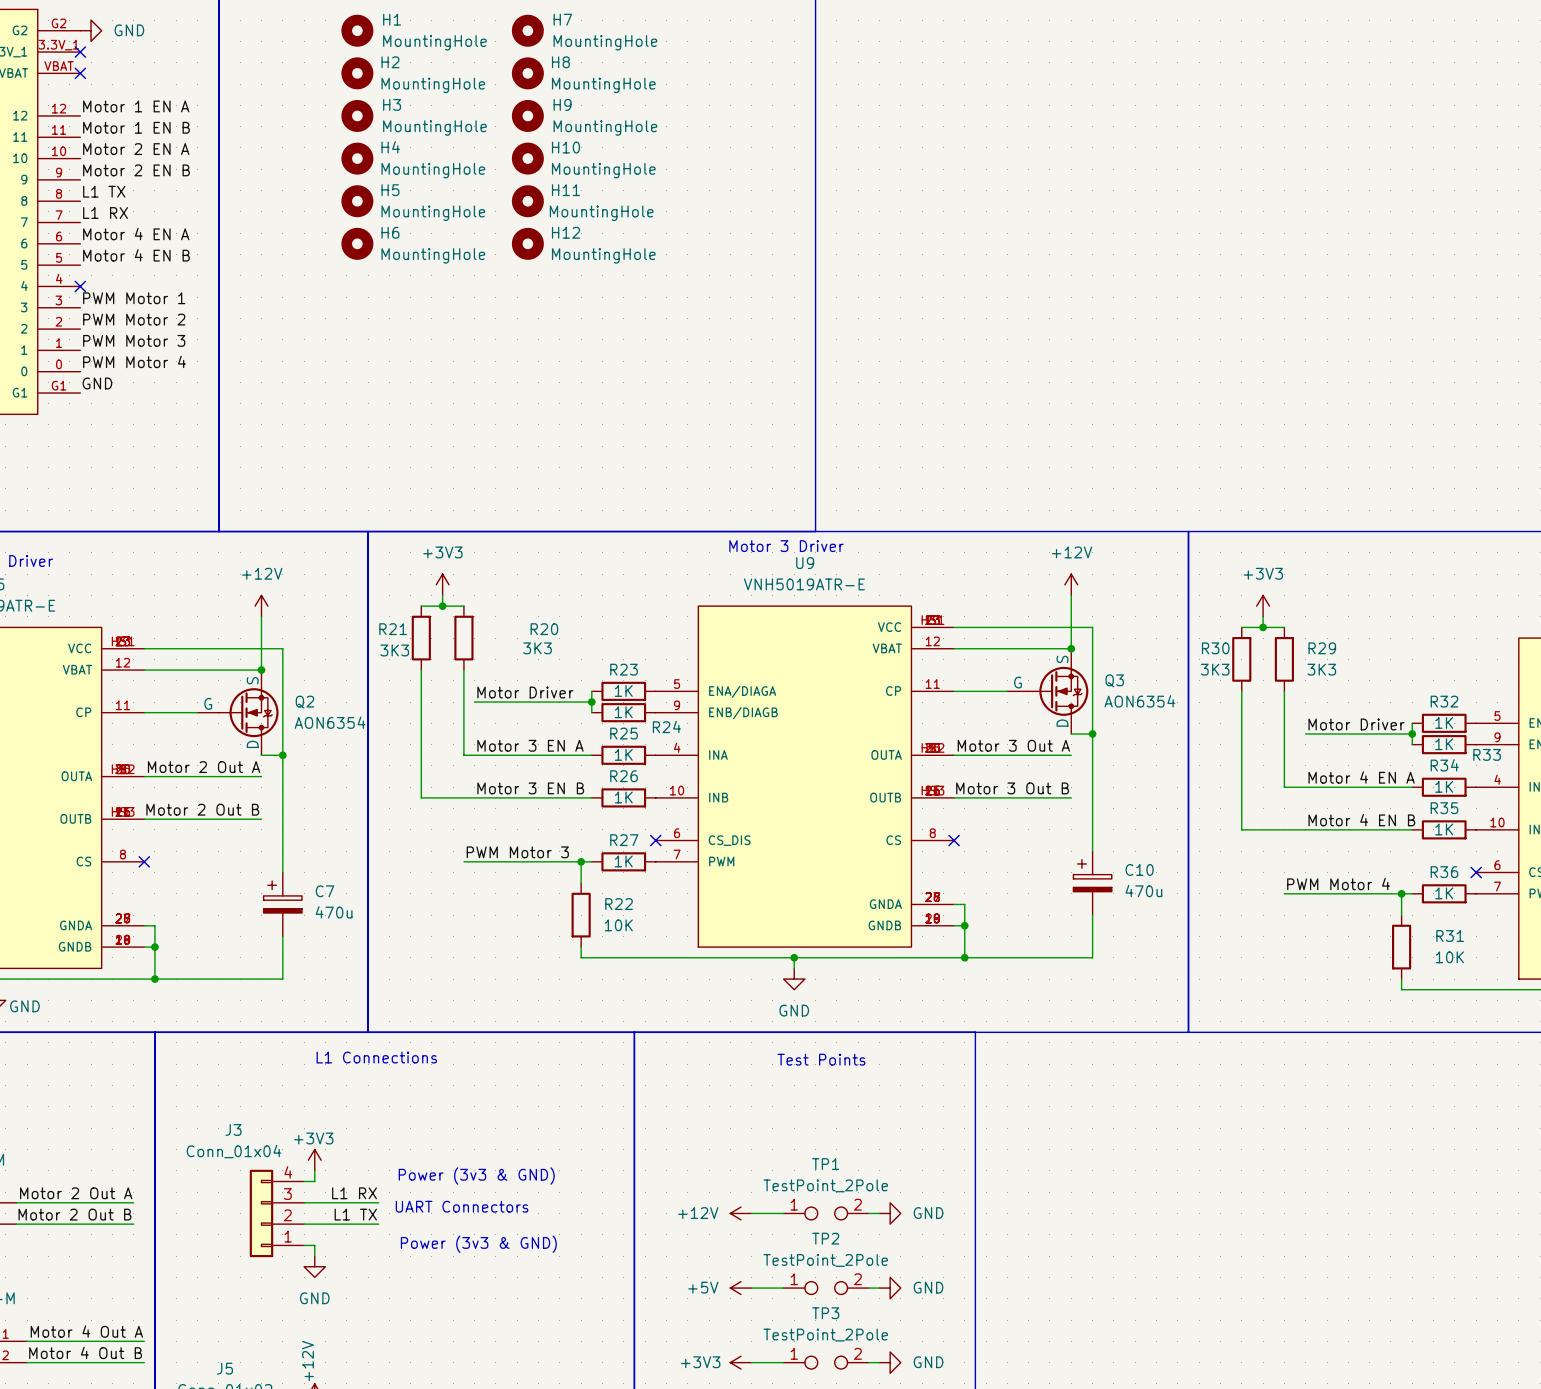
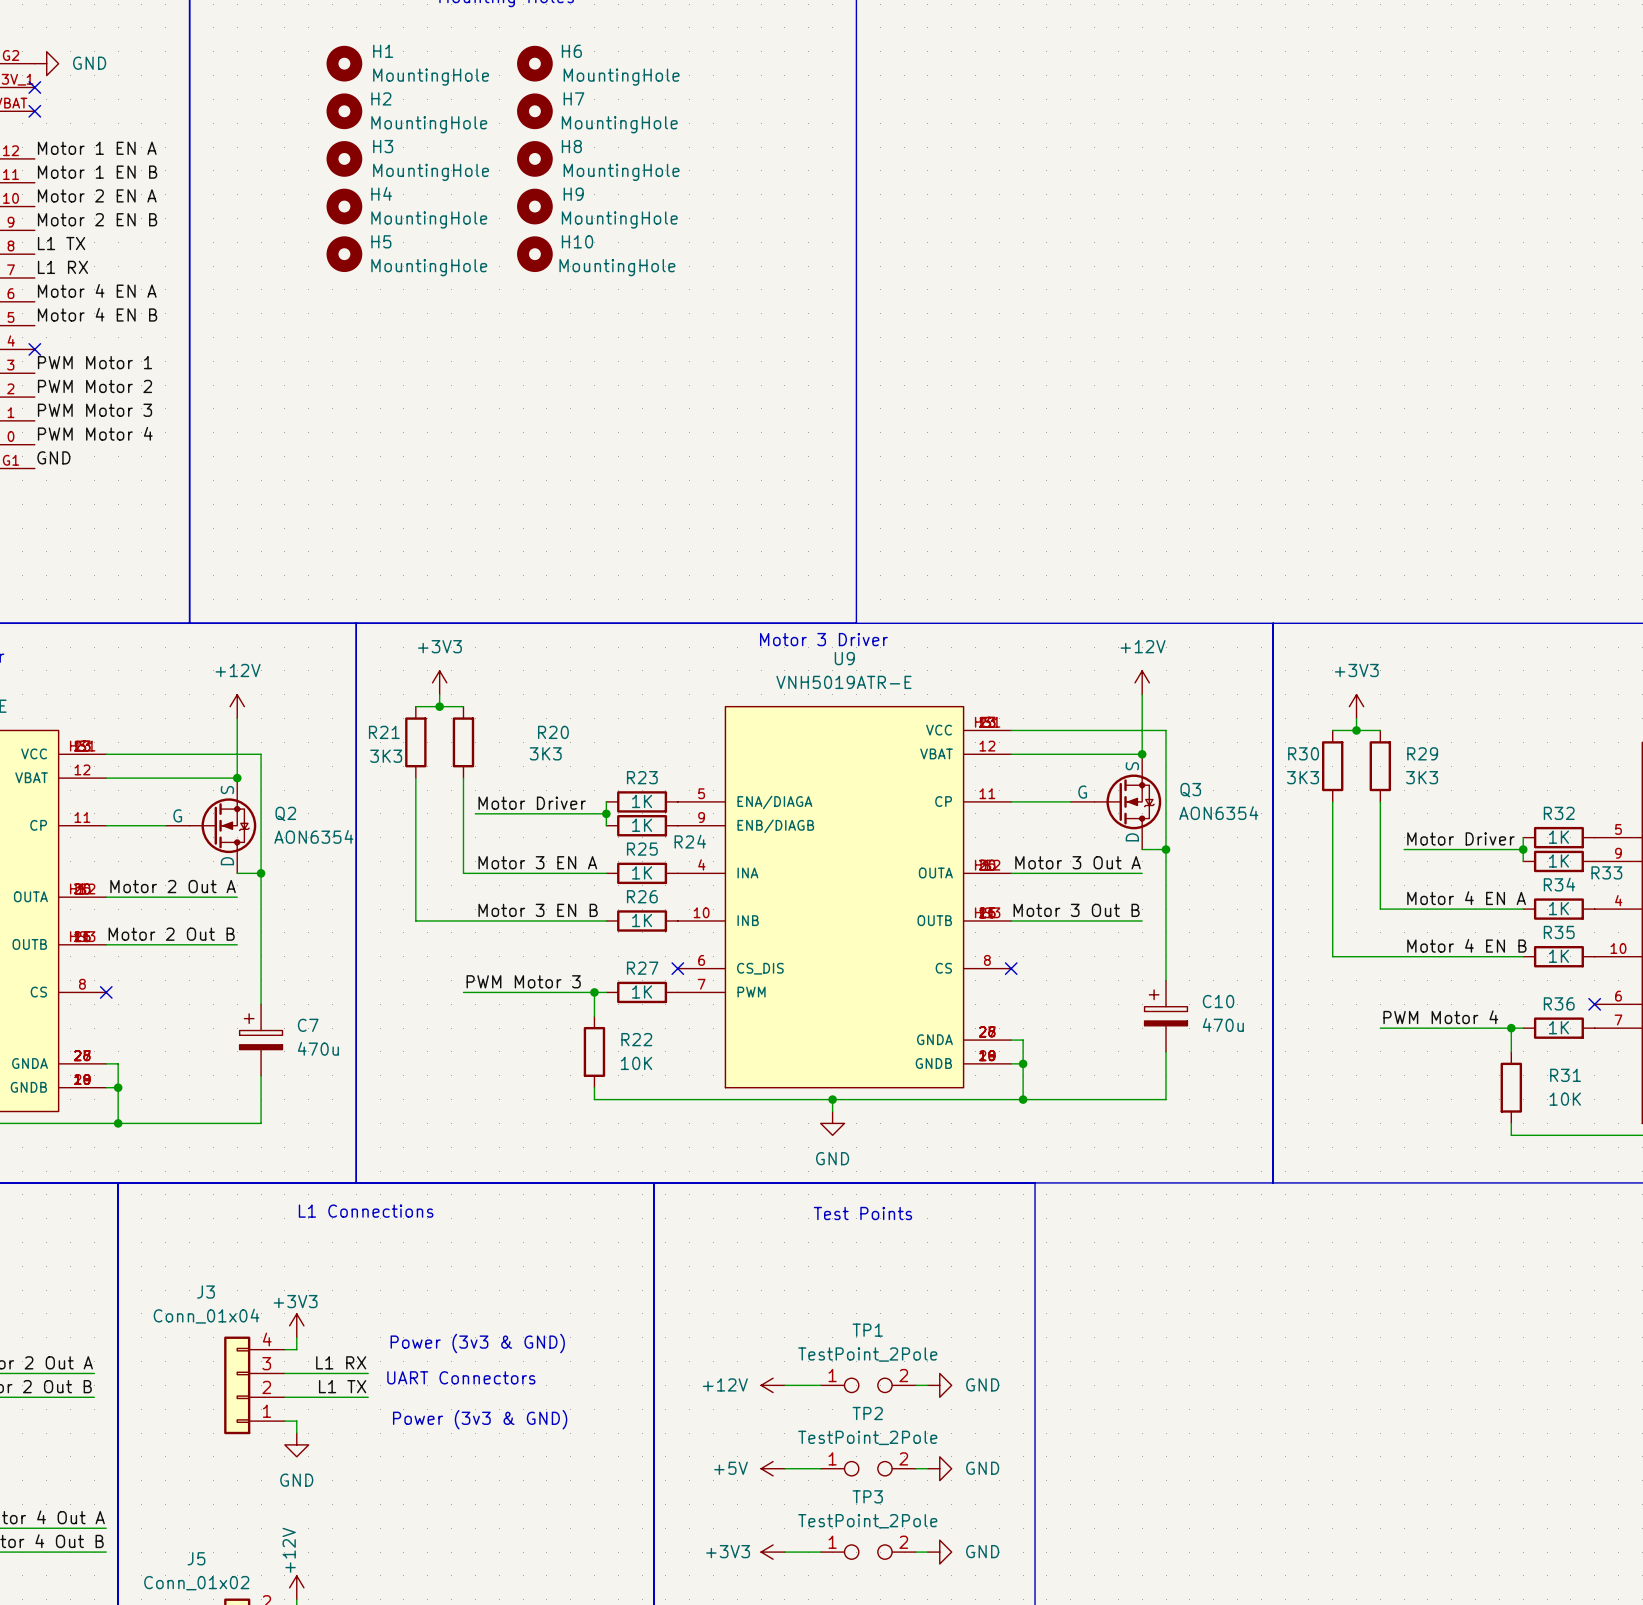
H7 name: H7 (562, 19) -> H6 (571, 51)
H8 name: H8 (560, 62) -> H7 (573, 98)
H9 name: H9 (562, 104) -> H8 (571, 146)
H10 name: H10 (566, 147) -> H9 (573, 194)
H11 name: H11 (566, 190) -> H10 (577, 241)
H6: MountingHole (357, 243) -> none
H12: MountingHole (527, 243) -> none

